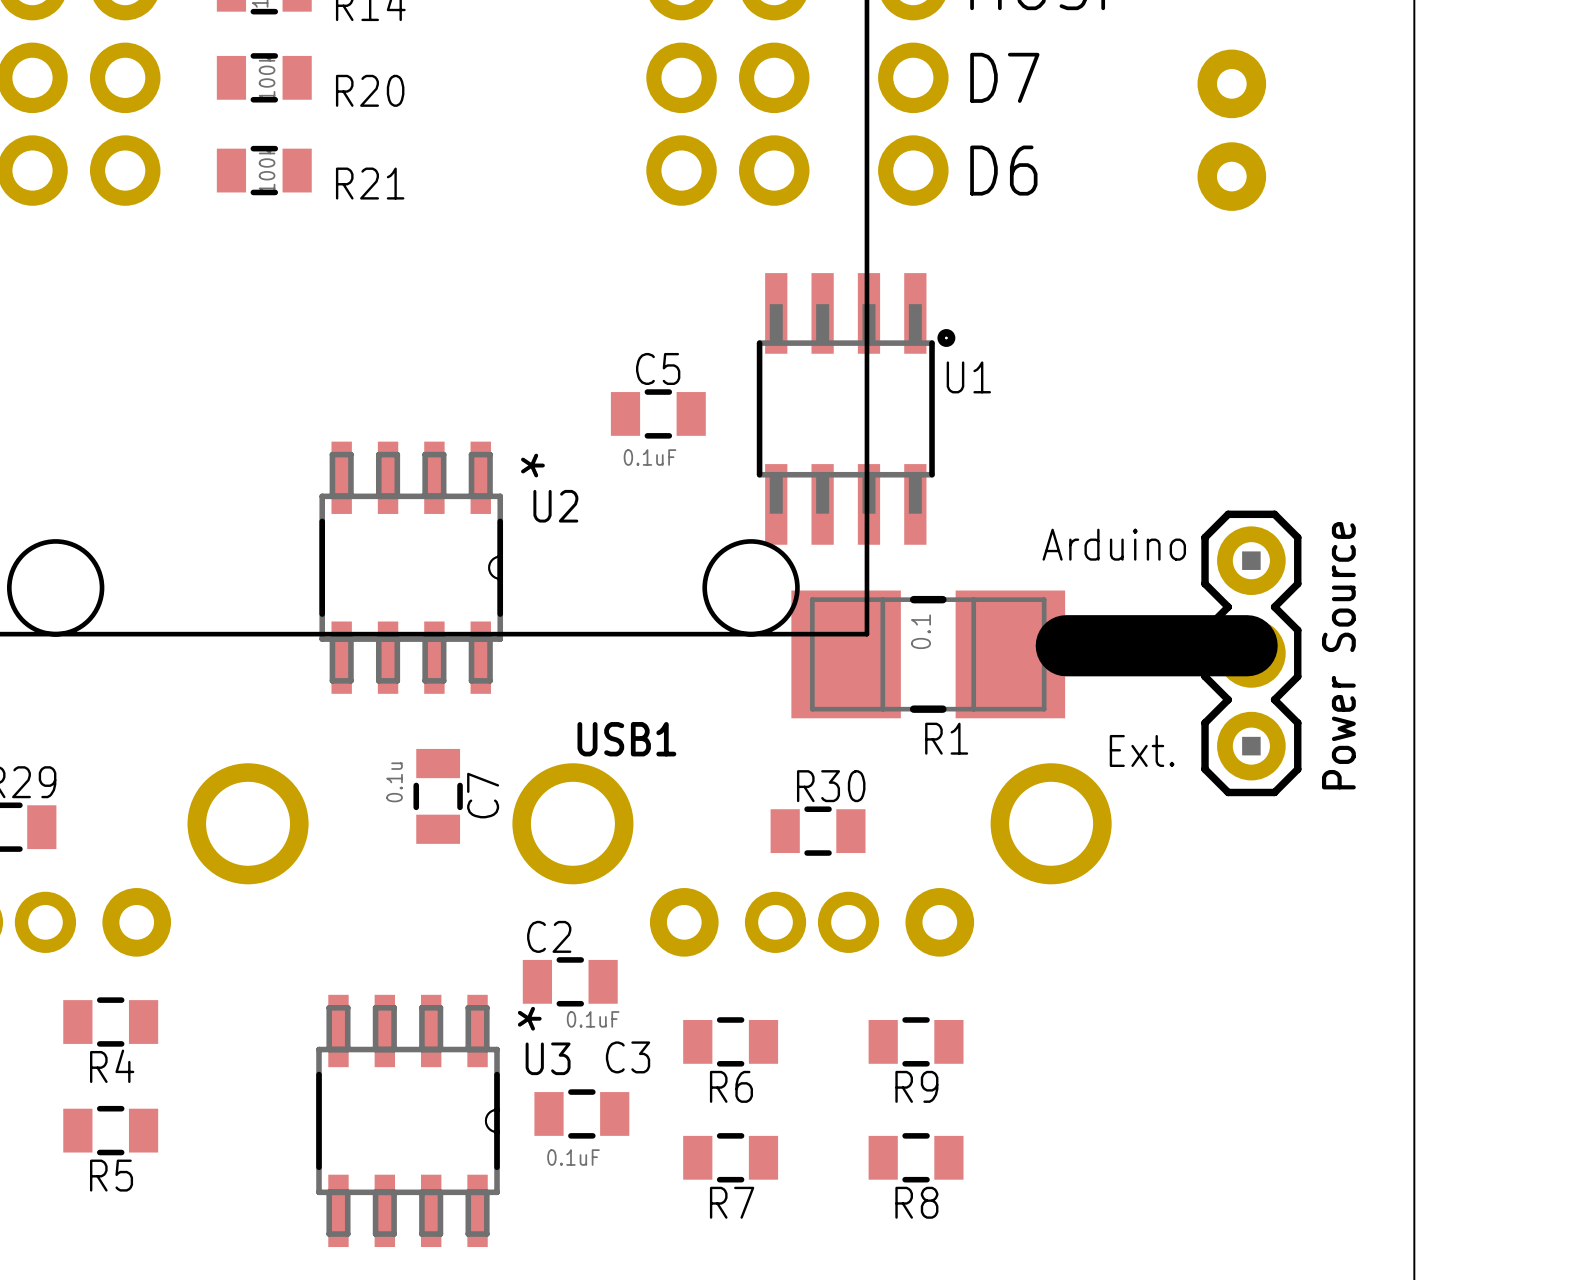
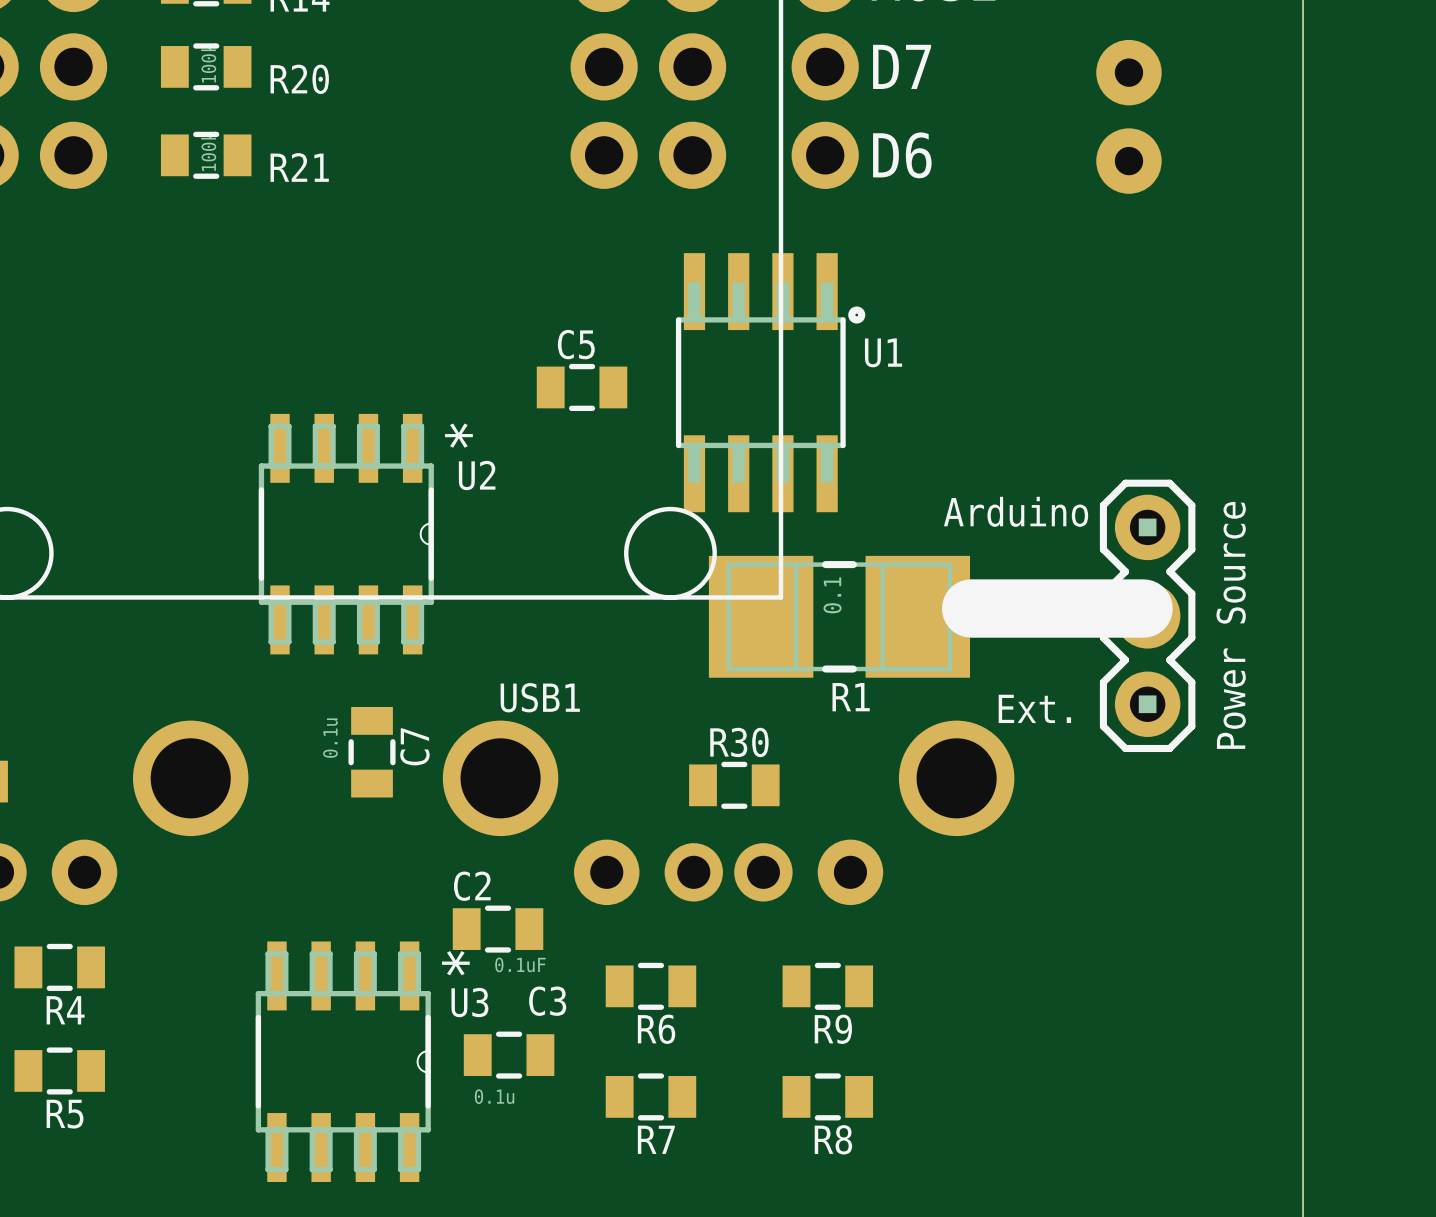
C5 value: 0.1uF (650, 457) -> none
C3 value: 0.1uF (573, 1157) -> 0.1u (494, 1096)

